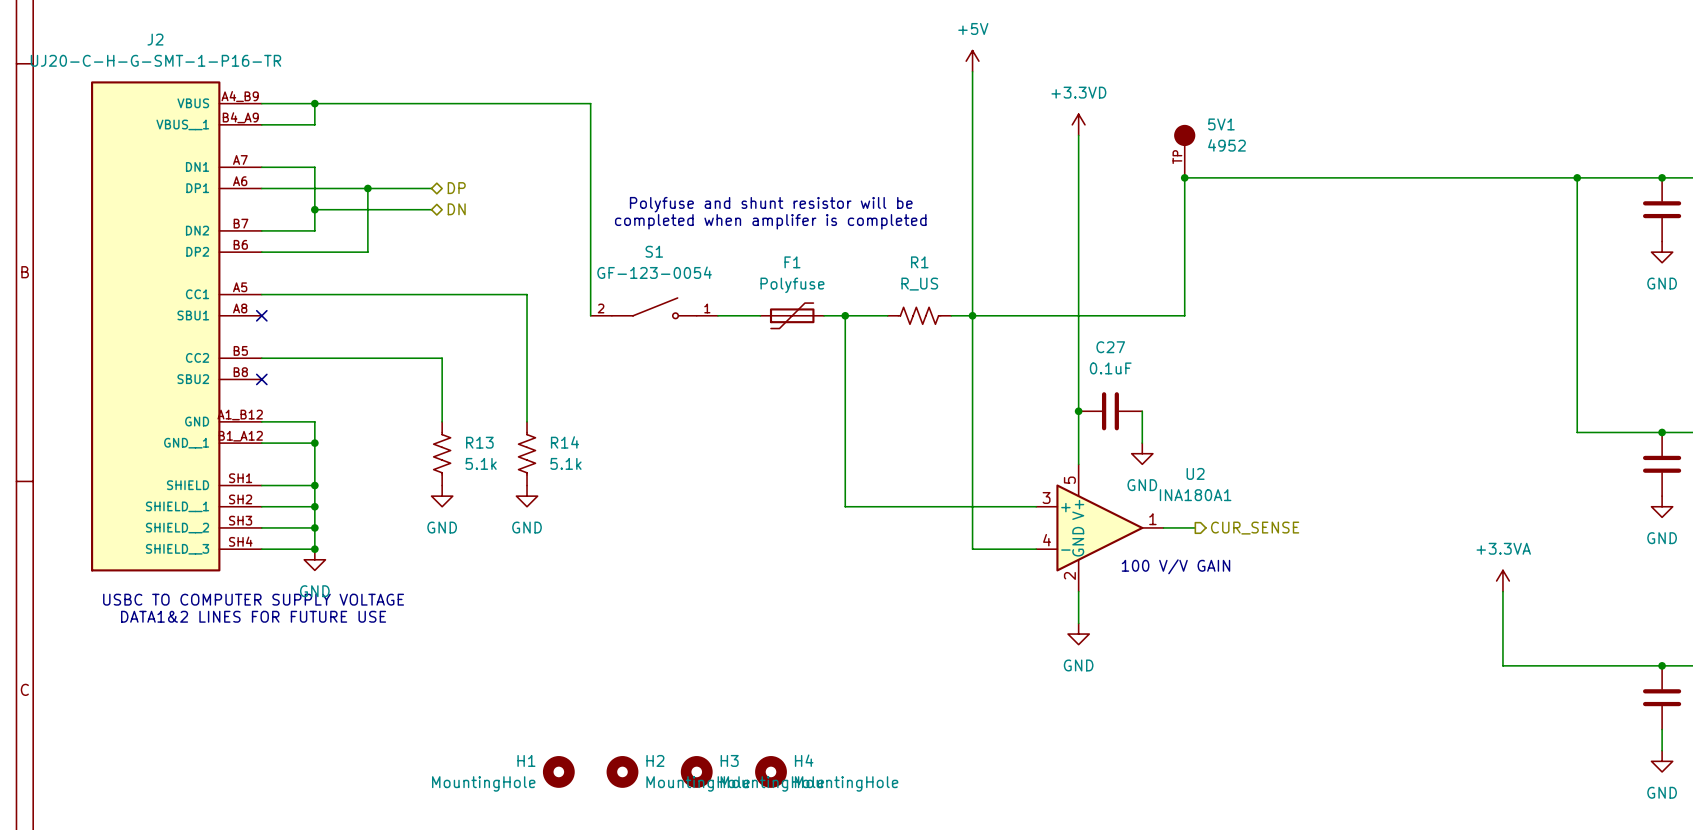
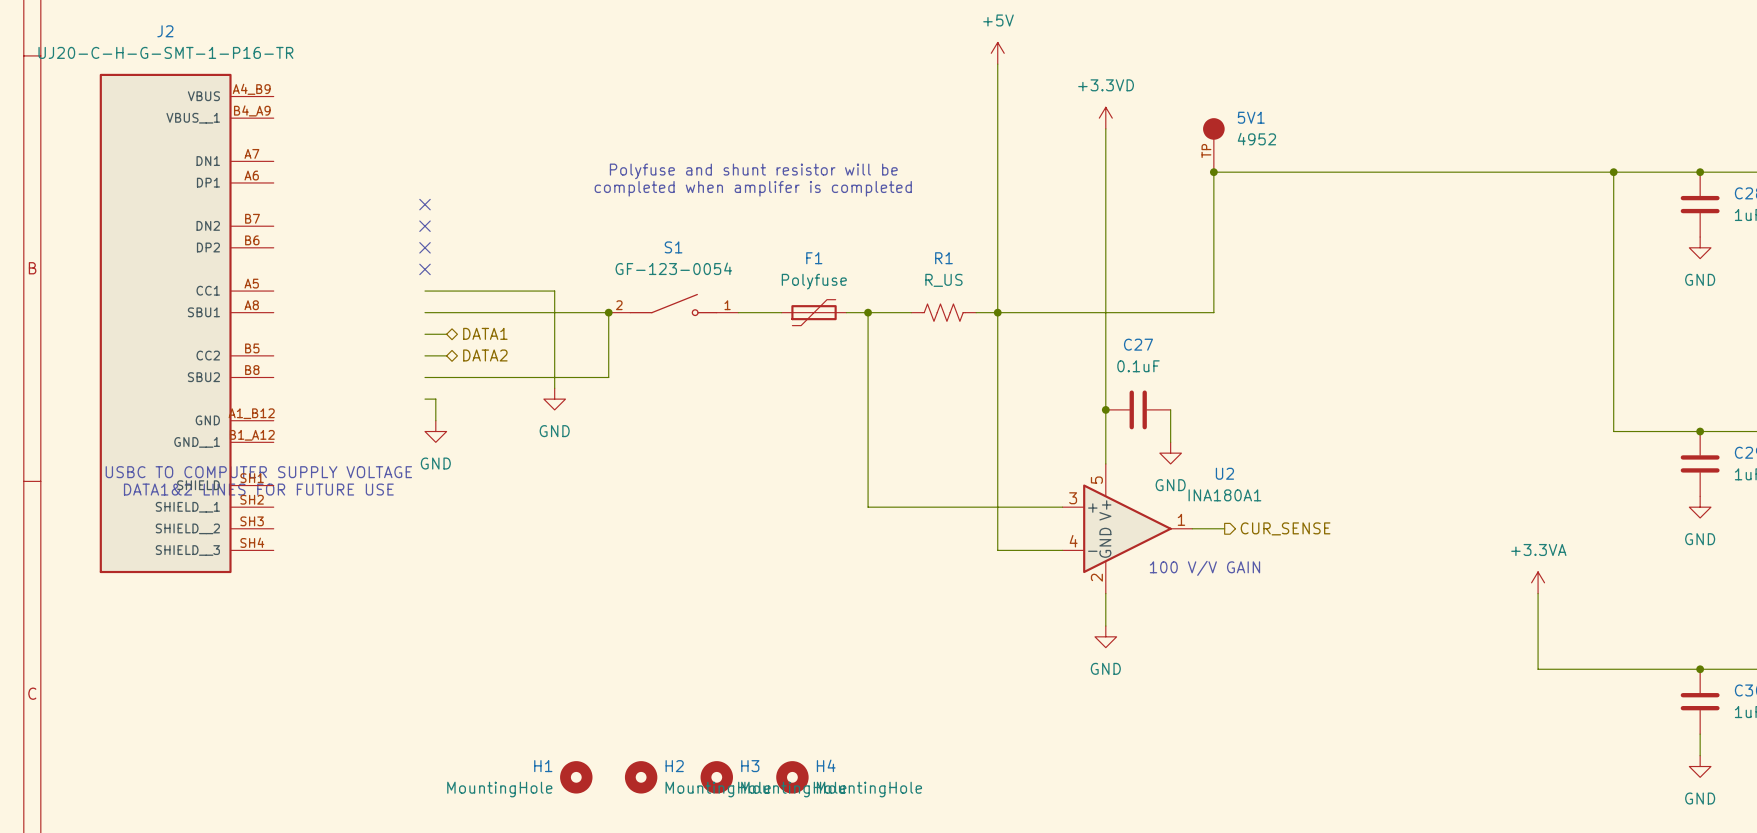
wire: (261, 103) (590, 103) (590, 315) -> none
wire: (314, 103) (314, 124) (261, 124) -> none
junction: (314, 103) -> none
wire: (261, 167) (314, 167) (314, 230) (261, 230) -> none
wire: (261, 188) (431, 188) -> none
wire: (367, 188) (367, 252) (261, 252) -> none
junction: (367, 188) -> none
hierarchical label: DP (456, 188) -> none
text position: Polyfuse and shunt resistor will be (771, 204) -> Polyfuse and shunt resistor will be (753, 171)
wire: (314, 209) (431, 209) -> none
junction: (314, 209) -> none
no-connect mark: none -> (425, 204)
hierarchical label: DN (456, 209) -> none
text position: completed when amplifer is completed (770, 221) -> completed when amplifer is completed (753, 188)
no-connect mark: none -> (425, 226)
no-connect mark: none -> (425, 247)
no-connect mark: none -> (425, 269)
wire: (261, 294) (410, 294) -> none
wire: (527, 294) (527, 421) -> (543, 291) (554, 291) (554, 388)
no-connect mark: (261, 315) -> none
wire: none -> (425, 312) (608, 312) (608, 377) (425, 377)
junction: none -> (608, 312)
hierarchical label: none -> DATA1 (485, 333)
wire: none -> (425, 334) (446, 334)
hierarchical label: none -> DATA2 (485, 355)
wire: (261, 358) (410, 358) -> none
wire: (431, 358) (442, 358) (442, 421) -> none
no-connect mark: (261, 379) -> none
wire: none -> (425, 399) (435, 399) (435, 420)
power symbol: none -> GND (554, 399)
wire: (261, 421) (314, 421) (314, 549) (261, 549) -> none
power symbol: none -> GND (435, 431)
wire: (261, 443) (314, 443) -> none
junction: (314, 443) -> none
R13: 5.1k (442, 453) -> none
R14: 5.1k (527, 453) -> none
wire: (261, 485) (314, 485) -> none
junction: (314, 485) -> none
power symbol: GND (442, 496) -> none
power symbol: GND (527, 496) -> none
wire: (261, 506) (314, 506) -> none
junction: (314, 506) -> none
wire: (261, 527) (314, 527) -> none
junction: (314, 527) -> none
junction: (314, 549) -> none
power symbol: GND (314, 559) -> none
text position: USBC TO COMPUTER SUPPLY VOLTAGE (253, 599) -> USBC TO COMPUTER SUPPLY VOLTAGE (258, 472)
text position: DATA1&2 LINES FOR FUTURE USE (253, 616) -> DATA1&2 LINES FOR FUTURE USE (258, 489)

